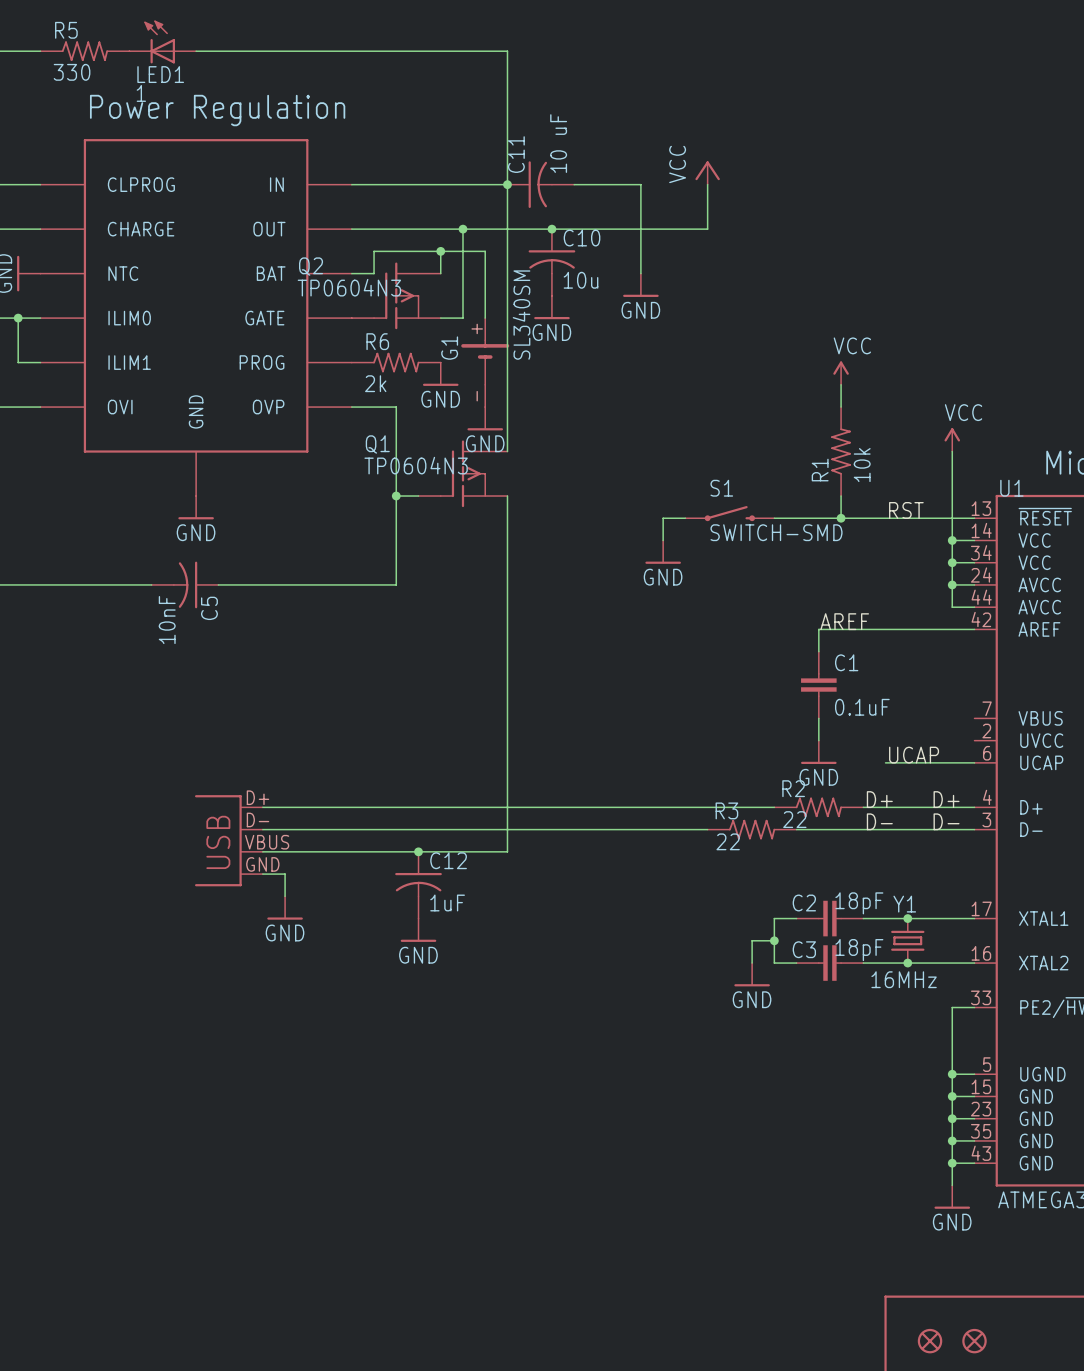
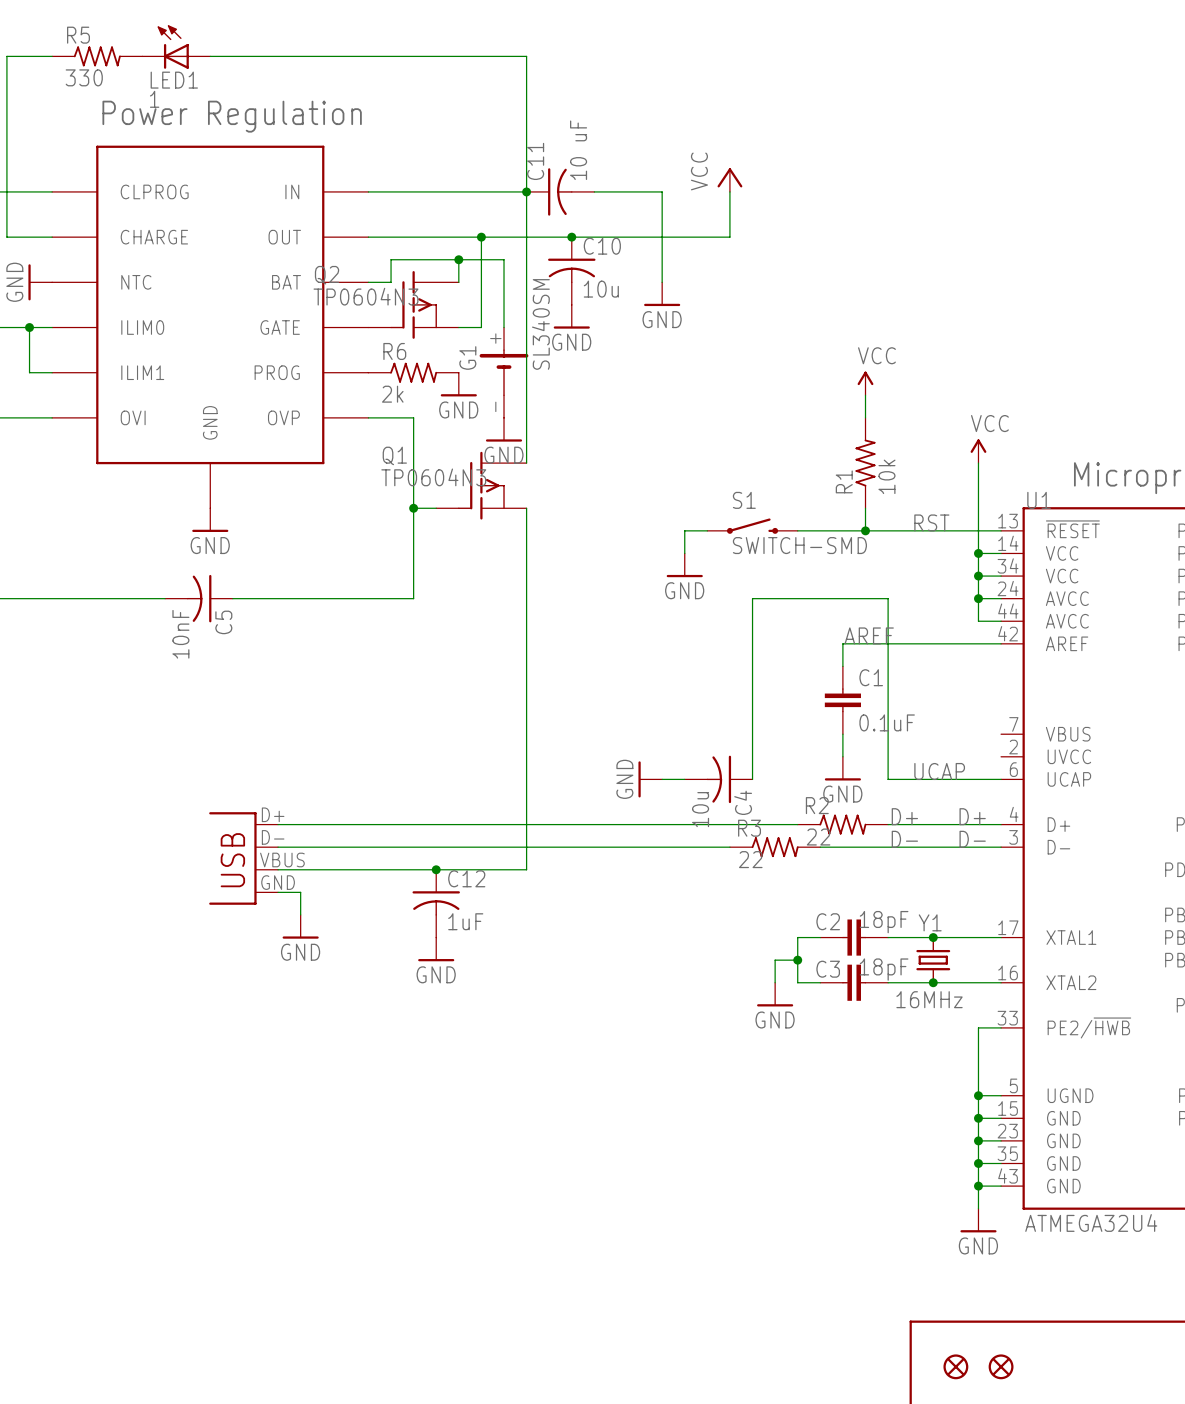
power symbol: none -> GND (650, 779)
wire: none -> (662, 779) (684, 779)
C4: none -> 10u (718, 779)
wire: none -> (752, 779) (752, 598) (888, 598) (888, 779) (910, 779)

